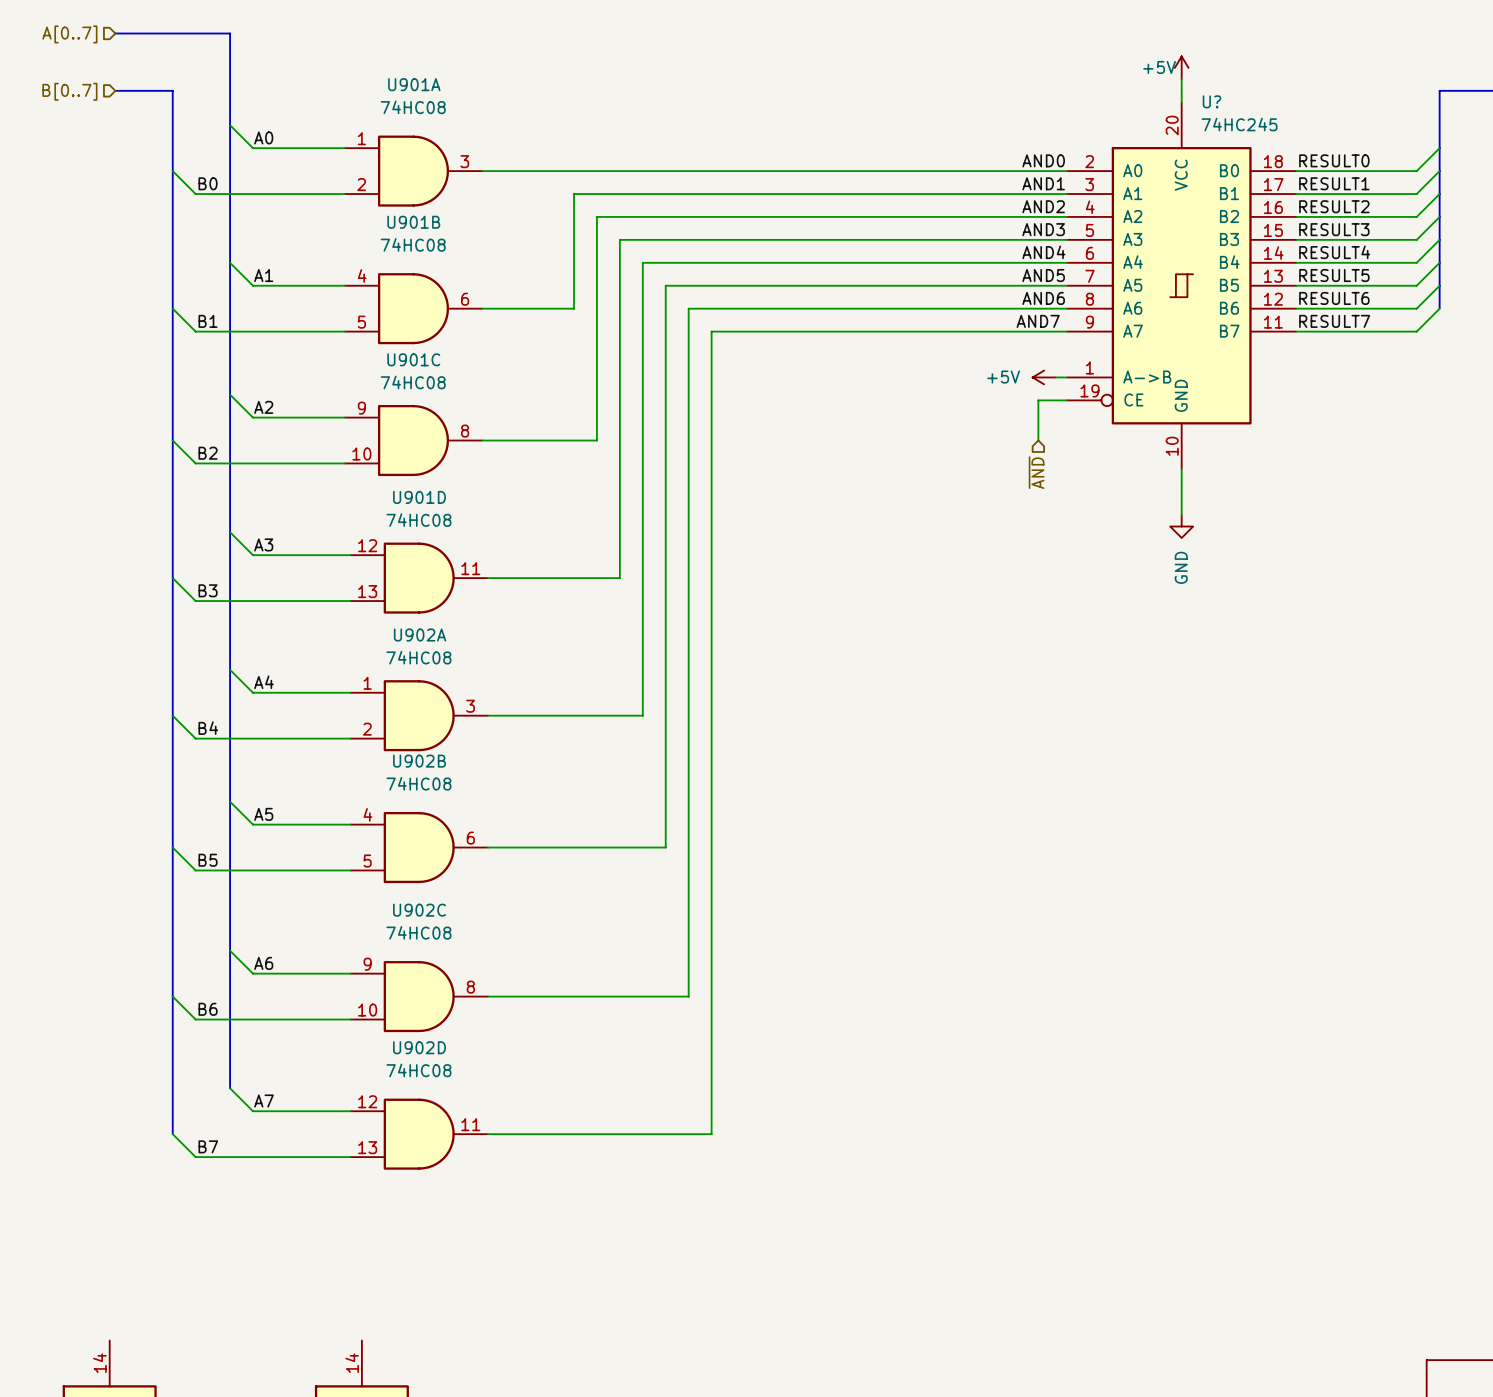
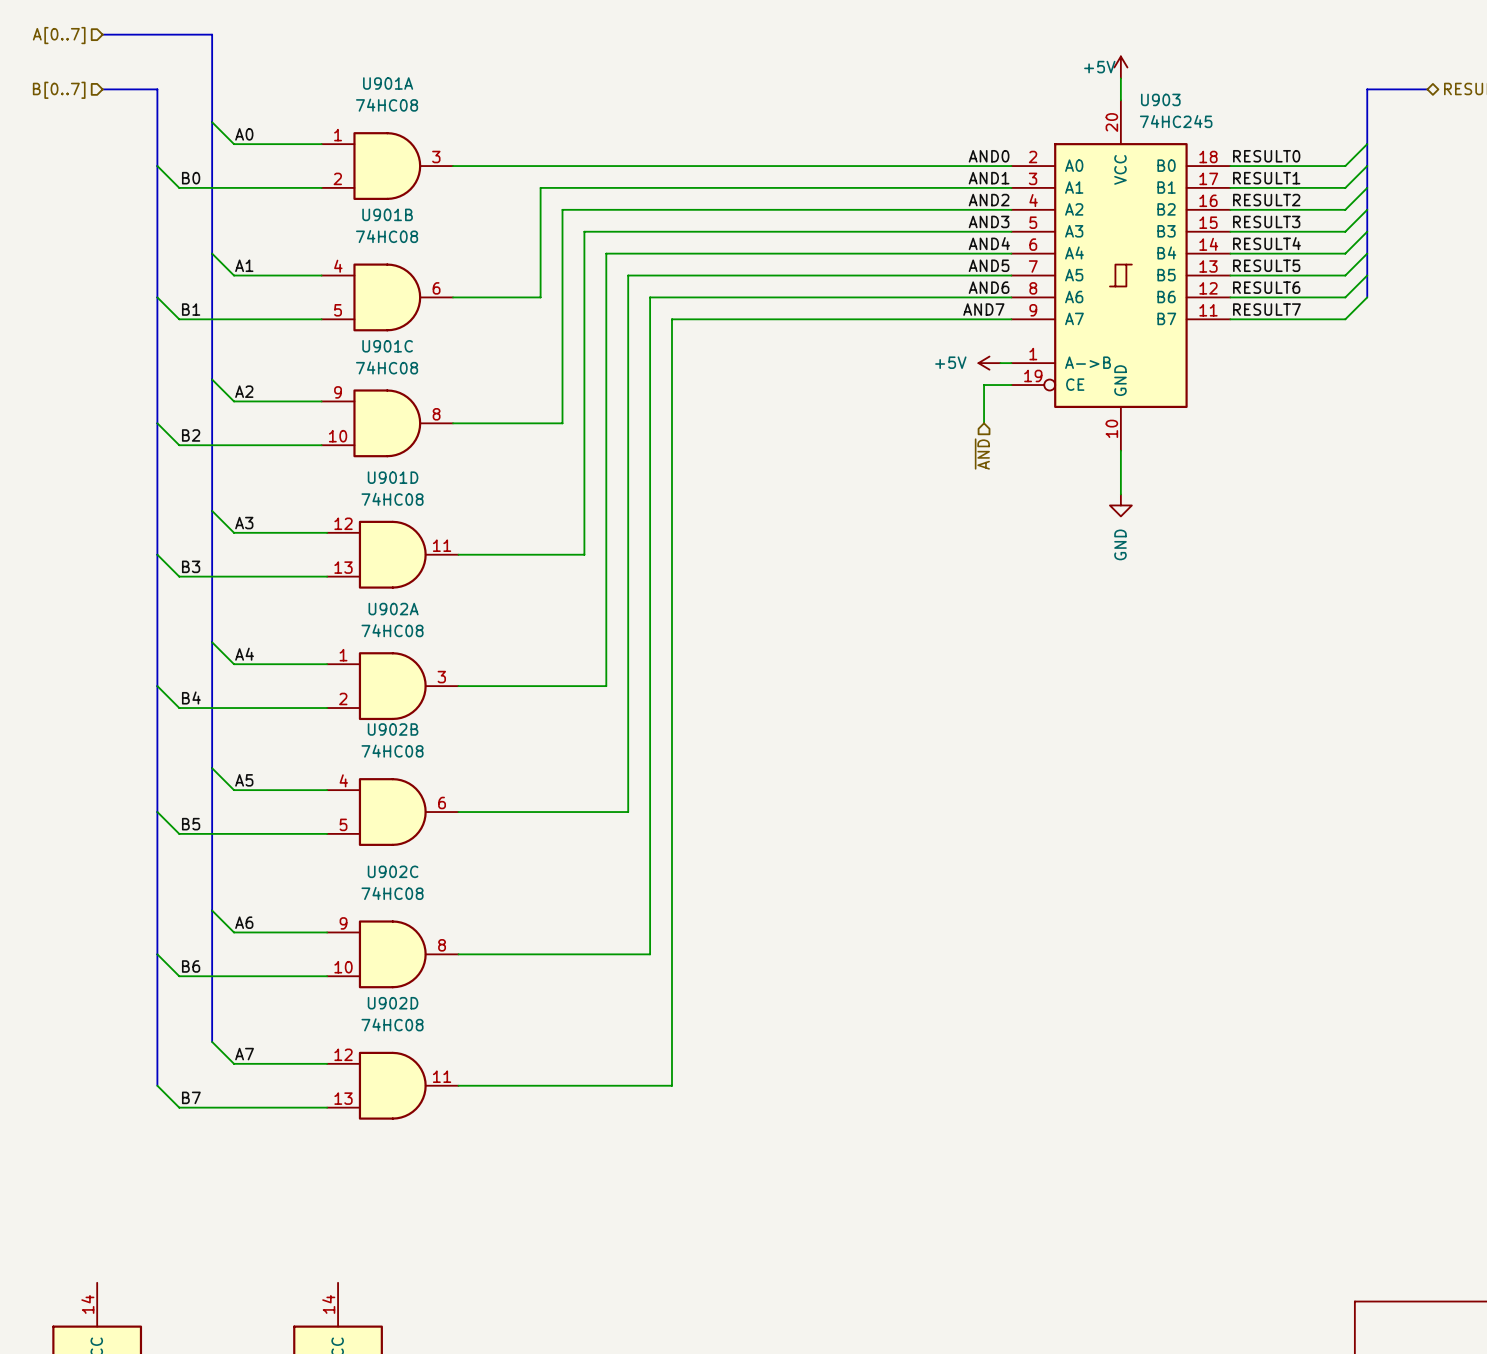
U? name: U? (1212, 101) -> U903 (1160, 99)

